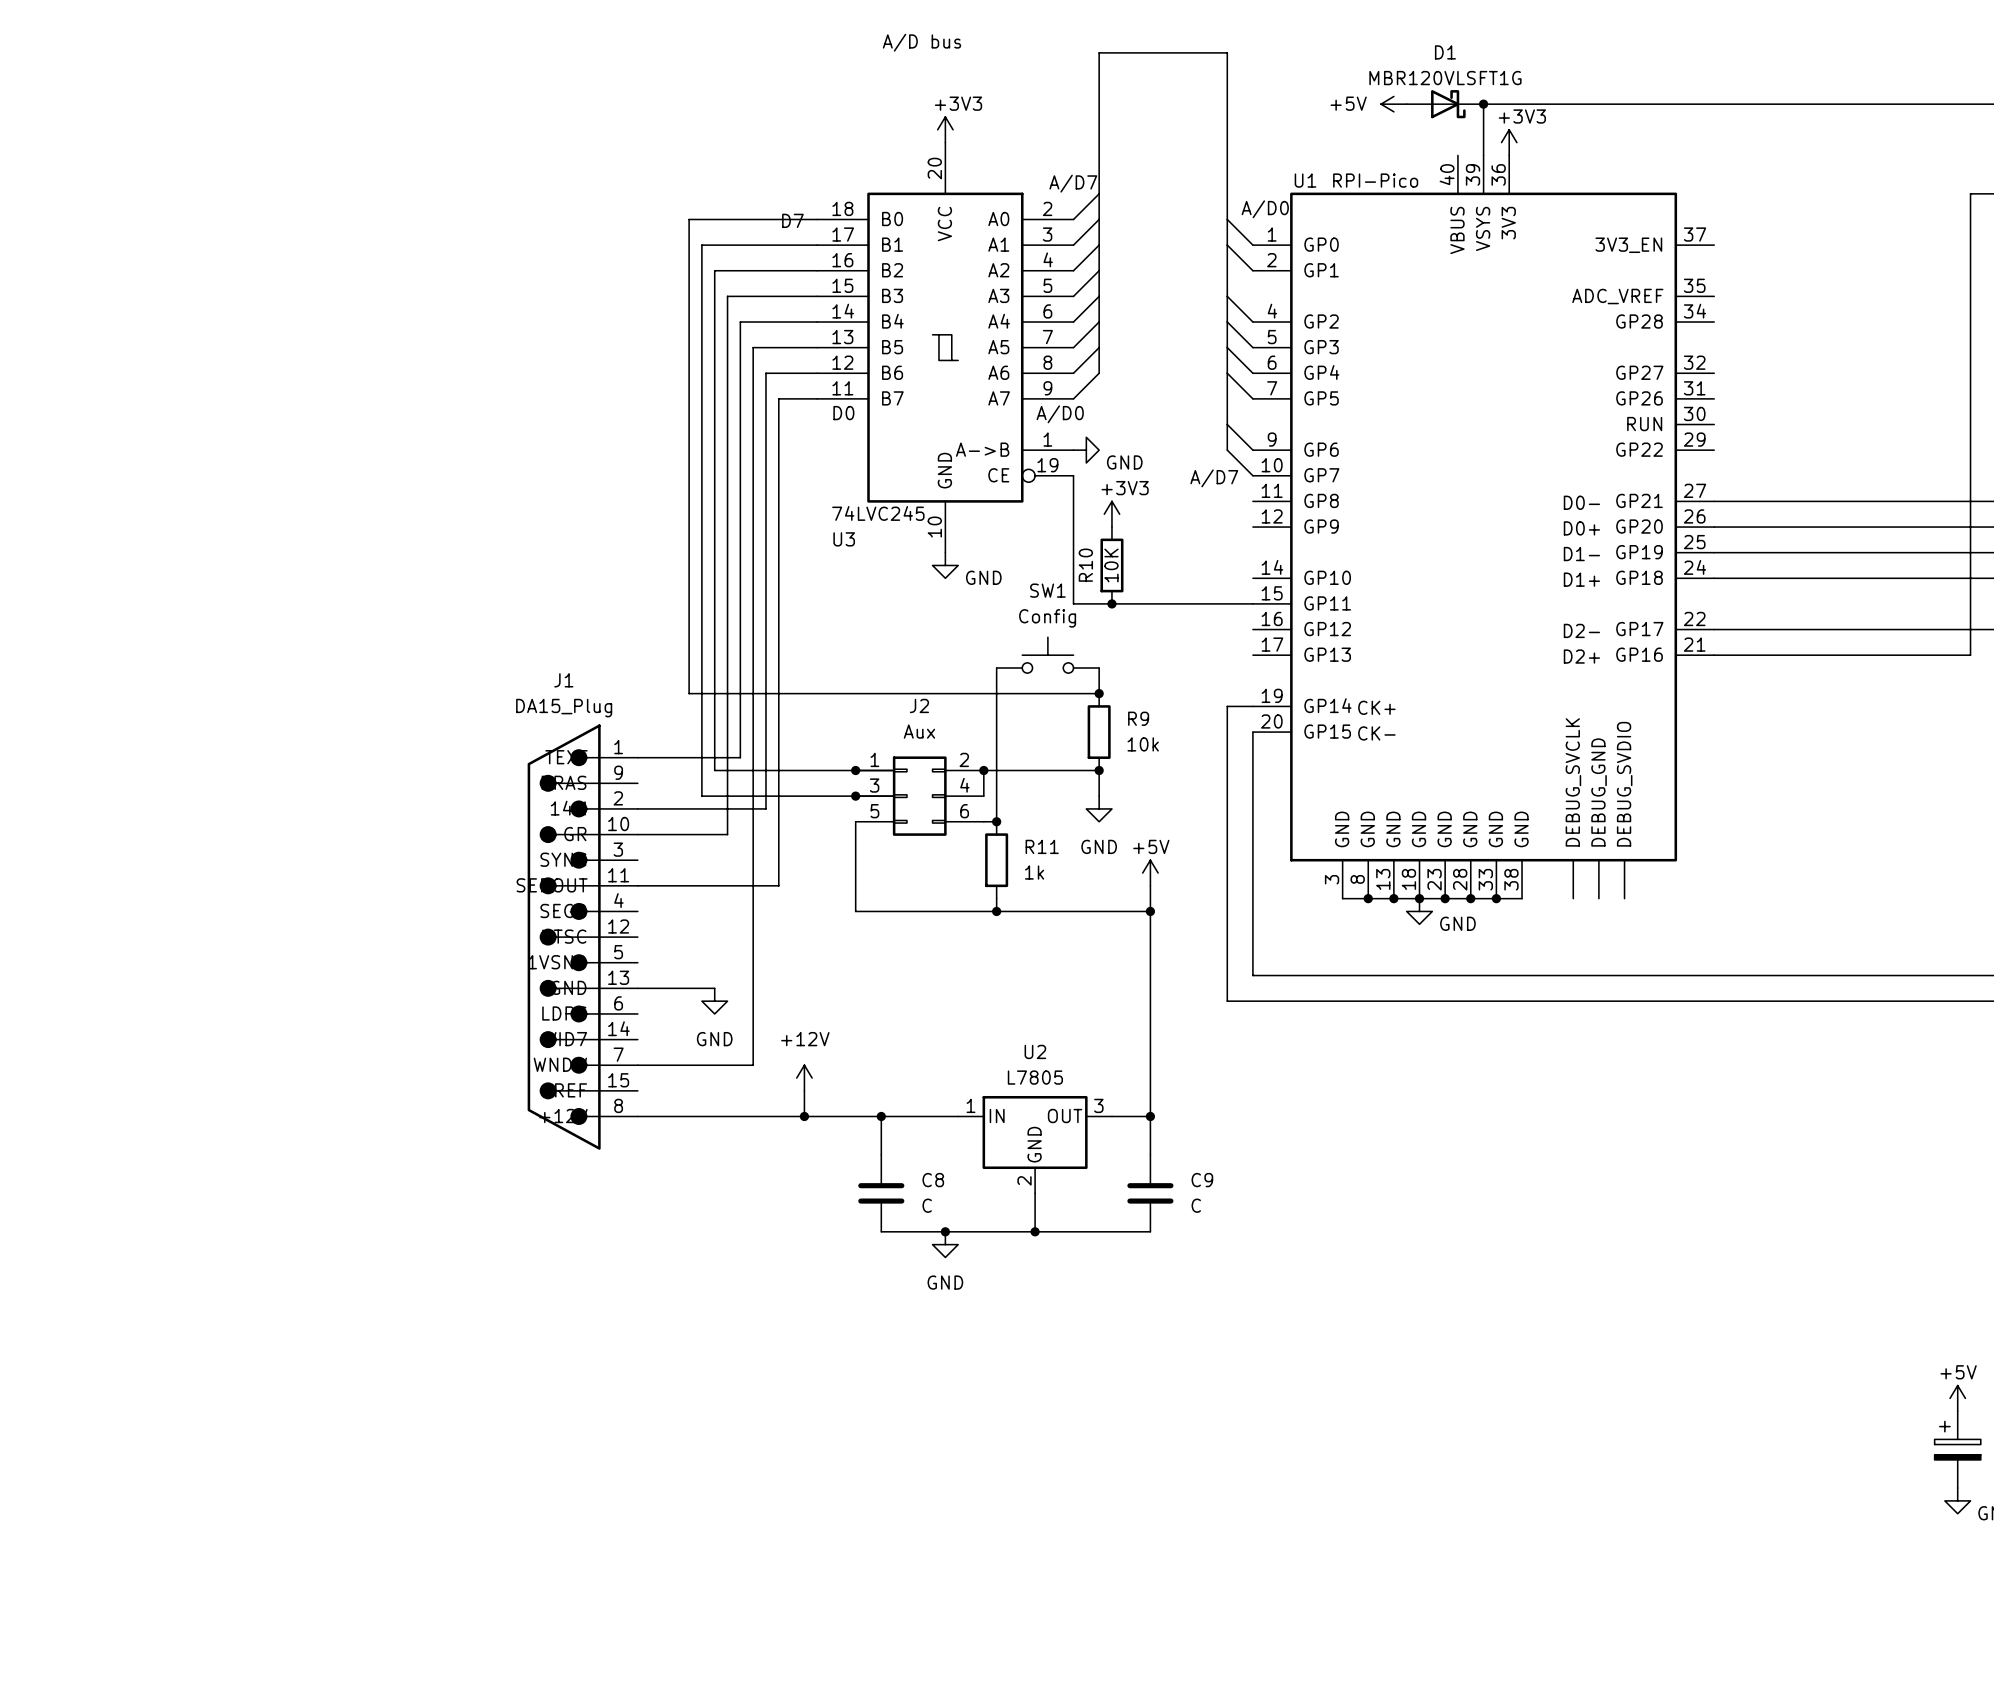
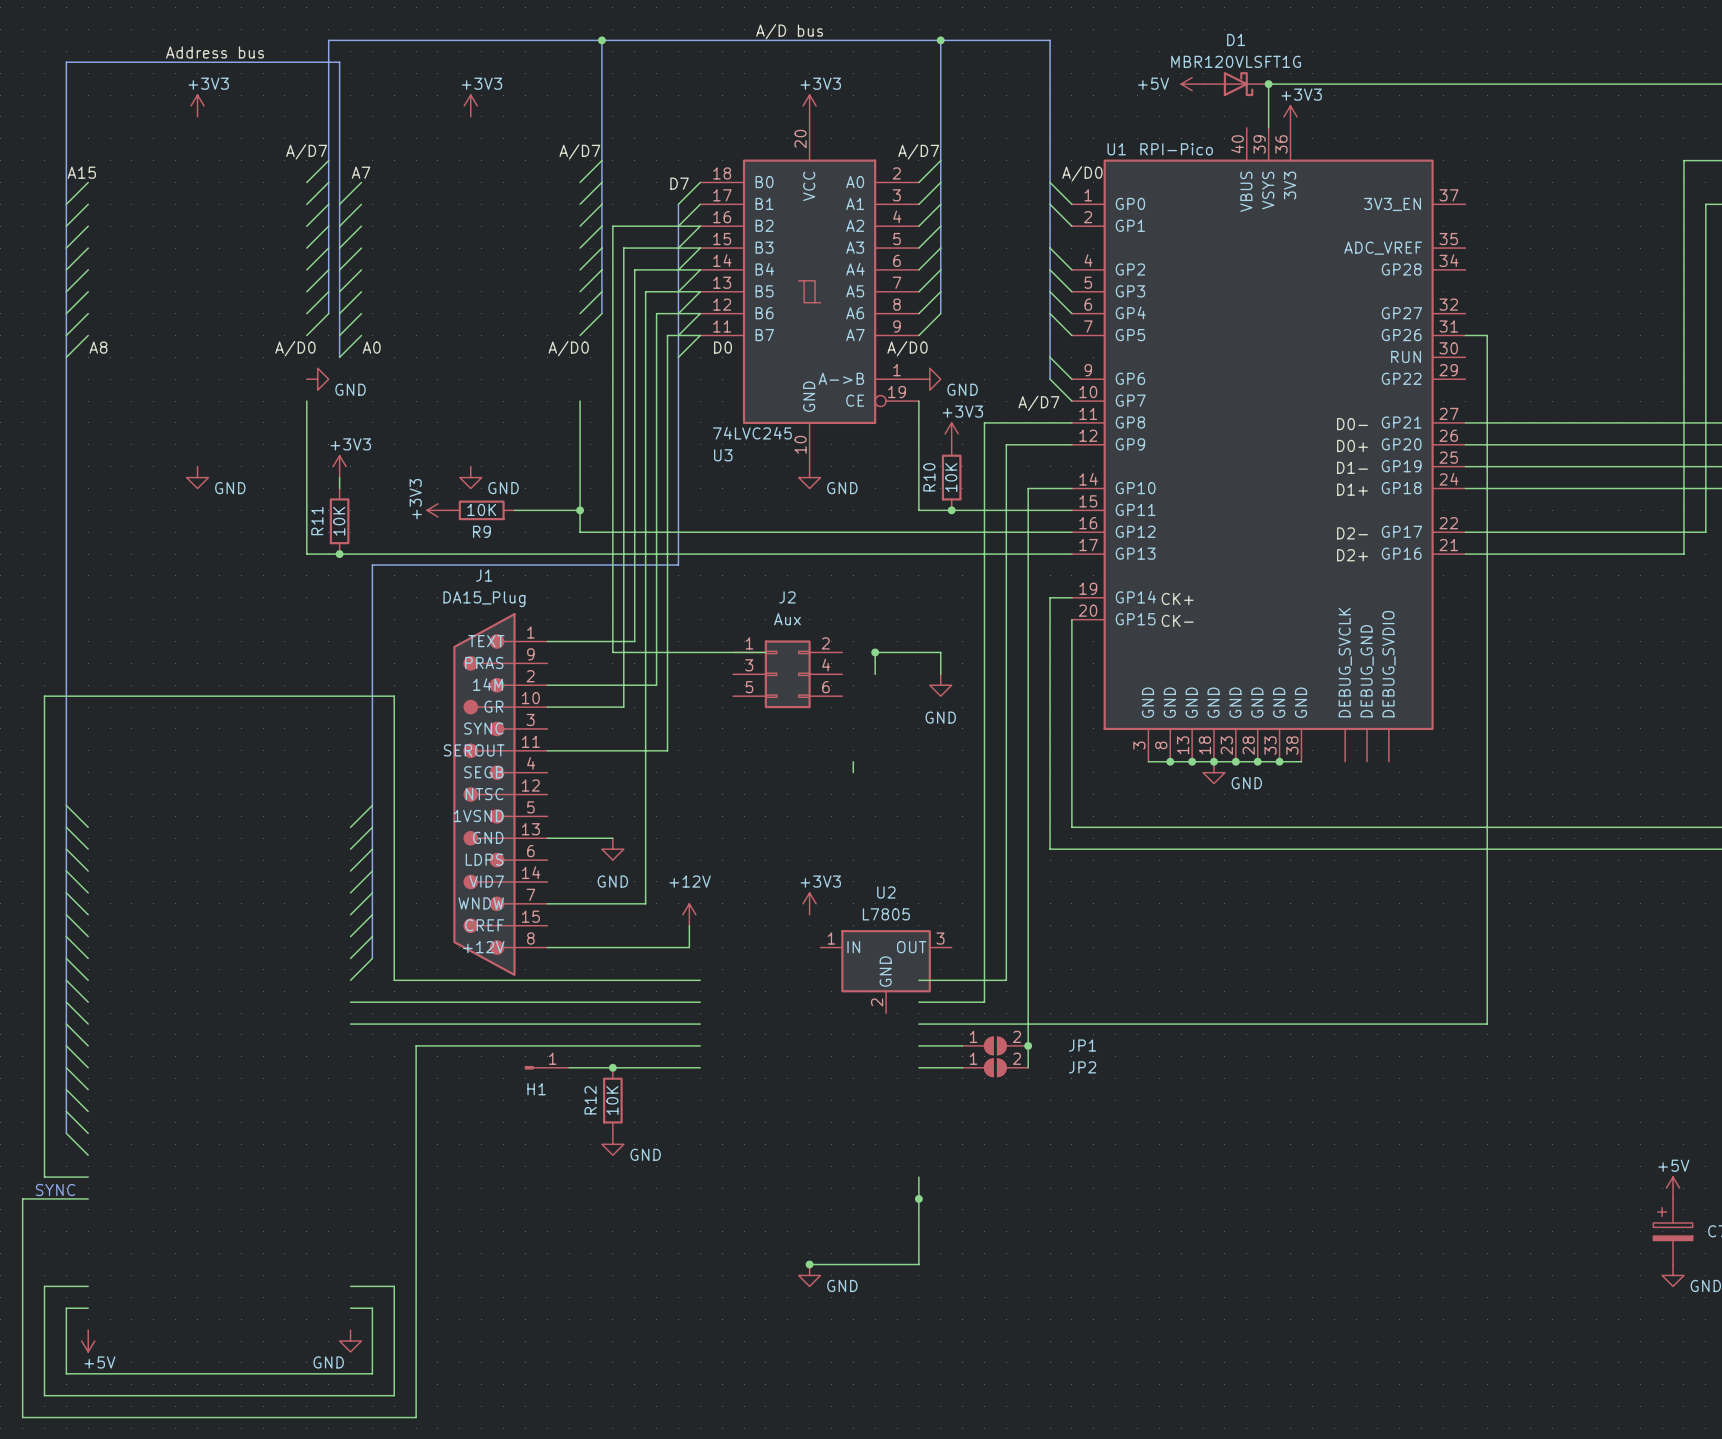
bus: none -> (601, 40) (601, 313)
junction: none -> (601, 40)
bus: none -> (940, 40) (328, 40) (328, 313)
junction: none -> (940, 40)
label: none -> Address bus (215, 52)
power symbol: none -> +3V3 (197, 105)
power symbol: none -> +3V3 (470, 105)
label: none -> A/D7 (306, 151)
label: none -> A/D7 (579, 151)
wire: none -> (328, 160) (306, 182)
wire: none -> (601, 160) (580, 182)
label: none -> A15 (81, 172)
label: none -> A7 (361, 172)
wire: none -> (88, 182) (66, 204)
wire: none -> (328, 182) (306, 204)
wire: none -> (361, 182) (339, 204)
wire: none -> (601, 182) (580, 204)
wire: (817, 219) (689, 219) (689, 693) (1099, 693) (1099, 667) -> (700, 182) (678, 204)
wire: none -> (88, 204) (66, 226)
wire: none -> (328, 204) (306, 226)
wire: none -> (361, 204) (339, 226)
wire: none -> (601, 204) (580, 226)
bus: none -> (678, 204) (678, 565) (372, 565) (372, 958)
wire: (817, 245) (701, 245) (701, 796) (894, 796) -> (700, 204) (678, 226)
wire: none -> (88, 226) (66, 248)
wire: none -> (328, 226) (306, 248)
wire: none -> (361, 226) (339, 248)
wire: none -> (601, 226) (580, 248)
wire: none -> (700, 226) (678, 248)
wire: none -> (88, 248) (66, 269)
wire: none -> (328, 248) (306, 269)
wire: none -> (361, 248) (339, 269)
wire: none -> (601, 248) (580, 269)
wire: none -> (700, 248) (678, 269)
wire: none -> (88, 269) (66, 291)
wire: none -> (328, 269) (306, 291)
wire: none -> (361, 269) (339, 291)
wire: none -> (601, 269) (580, 291)
wire: none -> (700, 269) (678, 291)
wire: none -> (88, 291) (66, 313)
wire: none -> (328, 291) (306, 313)
wire: none -> (361, 291) (339, 313)
wire: none -> (601, 291) (580, 313)
wire: none -> (700, 291) (678, 313)
wire: none -> (88, 313) (66, 335)
wire: none -> (328, 313) (306, 335)
wire: none -> (361, 313) (339, 335)
wire: none -> (601, 313) (580, 335)
wire: none -> (700, 313) (678, 335)
wire: none -> (88, 335) (66, 357)
wire: none -> (361, 335) (339, 357)
wire: none -> (700, 335) (678, 357)
wire: none -> (1465, 335) (1487, 335) (1487, 1024) (918, 1024)
label: none -> A8 (98, 347)
label: none -> A0 (371, 347)
label: none -> A/D0 (295, 348)
label: none -> A/D0 (568, 348)
bus: none -> (339, 357) (339, 62) (66, 62) (66, 1133)
power symbol: none -> GND (317, 379)
wire: none -> (306, 401) (306, 554) (1071, 554)
wire: none -> (580, 401) (580, 532) (1071, 532)
wire: none -> (1071, 422) (984, 422) (984, 750)
wire: none -> (1071, 444) (1006, 444) (1006, 980) (918, 980)
power symbol: none -> +3V3 (339, 466)
power symbol: none -> GND (197, 477)
wire: none -> (339, 477) (339, 488)
power symbol: none -> GND (470, 477)
wire: none -> (1071, 488) (1028, 488) (1028, 1067)
power symbol: none -> +3V3 (437, 510)
wire: none -> (514, 510) (580, 510)
junction: none -> (580, 510)
junction: none -> (339, 554)
SW1: Config (1047, 655) -> none
wire: (996, 667) (996, 821) (983, 821) -> none
junction: (1099, 693) -> none
R9 name position: R9 (1138, 718) -> R9 (481, 531)
R9 rotation: 0° (1099, 732) -> 90° clockwise (481, 510)
R9 position: (1099, 732) -> (481, 510)
R9 value: 10k (1143, 744) -> 10K (481, 509)
junction: (855, 770) -> none
junction: (983, 770) -> none
wire: (1022, 770) (983, 770) (983, 796) -> (875, 652) (875, 674)
junction: none -> (875, 652)
junction: (1099, 770) -> none
junction: (855, 796) -> none
wire: (855, 821) (855, 911) (1150, 911) -> none
junction: (996, 821) -> none
R11 name rotation: 0° (1042, 846) -> 90° counterclockwise (317, 521)
R11 name position: R11 (1042, 846) -> R11 (317, 521)
R11 position: (996, 860) -> (339, 521)
R11 value: 1k (1034, 872) -> 10K (339, 521)
power symbol: +5V (1150, 873) -> none
junction: (996, 911) -> none
junction: (1150, 911) -> none
wire: none -> (66, 805) (88, 827)
wire: none -> (372, 805) (350, 827)
wire: none -> (66, 827) (88, 849)
wire: none -> (372, 827) (350, 849)
wire: none -> (66, 849) (88, 871)
wire: none -> (372, 849) (350, 871)
wire: none -> (66, 871) (88, 892)
wire: none -> (372, 871) (350, 892)
wire: none -> (66, 892) (88, 914)
wire: none -> (372, 892) (350, 914)
power symbol: none -> +3V3 (809, 903)
wire: none -> (66, 914) (88, 936)
wire: none -> (372, 914) (350, 936)
wire: none -> (66, 936) (88, 958)
wire: none -> (372, 936) (350, 958)
wire: (804, 1116) (958, 1116) -> (569, 1067) (700, 1067)
junction: (804, 1116) -> none
wire: (881, 1116) (881, 1154) -> none
junction: (881, 1116) -> none
wire: (1111, 1116) (1150, 1116) -> none
junction: (1150, 1116) -> none
wire: none -> (66, 958) (88, 980)
wire: none -> (372, 958) (350, 980)
wire: none -> (66, 980) (88, 1002)
wire: none -> (700, 980) (394, 980) (394, 696) (44, 696) (44, 1177) (88, 1177)
wire: none -> (984, 980) (984, 1002) (918, 1002)
wire: none -> (66, 1002) (88, 1024)
wire: none -> (350, 1002) (700, 1002)
C8: C (881, 1193) -> none
wire: (1035, 1193) (1035, 1231) -> none
C9: C (1150, 1193) -> none
wire: none -> (66, 1024) (88, 1045)
wire: none -> (350, 1024) (700, 1024)
wire: none -> (66, 1045) (88, 1067)
wire: none -> (700, 1045) (416, 1045) (416, 1417) (22, 1417) (22, 1198) (88, 1198)
wire: (881, 1231) (1073, 1231) -> none
junction: (945, 1231) -> none
junction: (1035, 1231) -> none
JP1: none -> (995, 1045)
junction: none -> (1028, 1045)
power symbol: GND (945, 1244) -> none
wire: none -> (66, 1067) (88, 1089)
H1: none -> (546, 1067)
junction: none -> (612, 1067)
wire: none -> (918, 1067) (962, 1067)
JP2: none -> (995, 1067)
wire: none -> (66, 1089) (88, 1111)
R12: none -> 10K (612, 1100)
wire: none -> (66, 1111) (88, 1133)
wire: none -> (66, 1133) (88, 1155)
power symbol: none -> GND (612, 1144)
wire: none -> (918, 1177) (918, 1264) (809, 1264)
text: none -> SYNC (55, 1189)
junction: none -> (918, 1198)
junction: none -> (809, 1264)
power symbol: none -> GND (809, 1275)
wire: none -> (88, 1286) (44, 1286) (44, 1395) (394, 1395) (394, 1286) (350, 1286)
wire: none -> (88, 1308) (66, 1308) (66, 1373) (372, 1373) (372, 1308) (350, 1308)
power symbol: none -> +5V (88, 1341)
power symbol: none -> GND (350, 1341)

